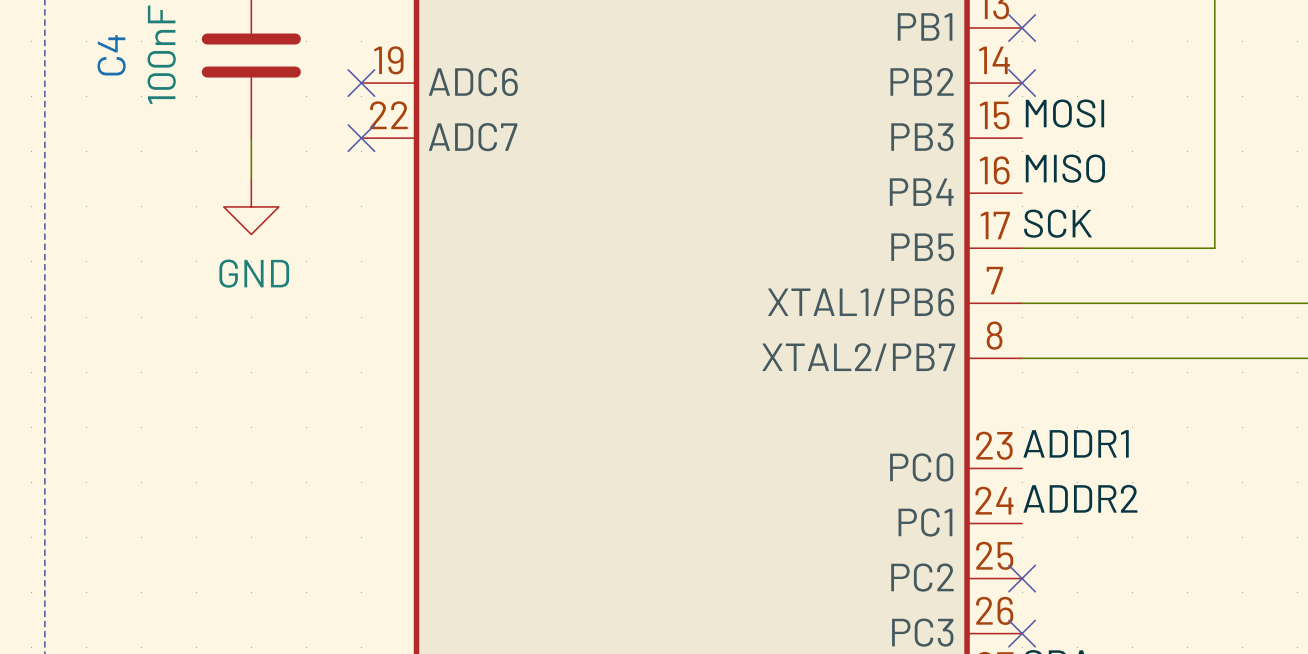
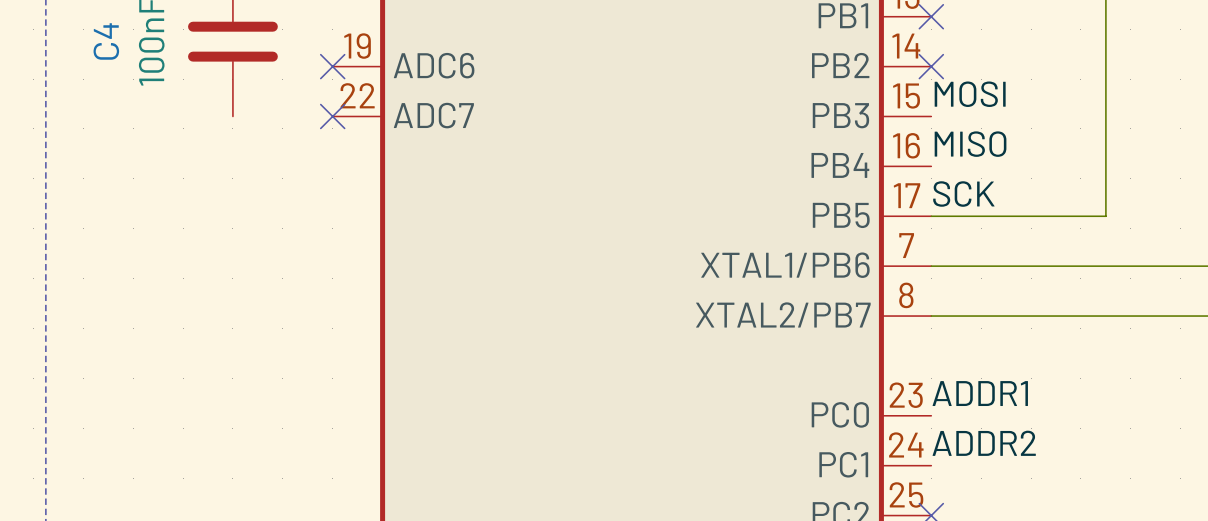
wire: (251, 138) (251, 179) -> none
power symbol: GND (251, 206) -> none

